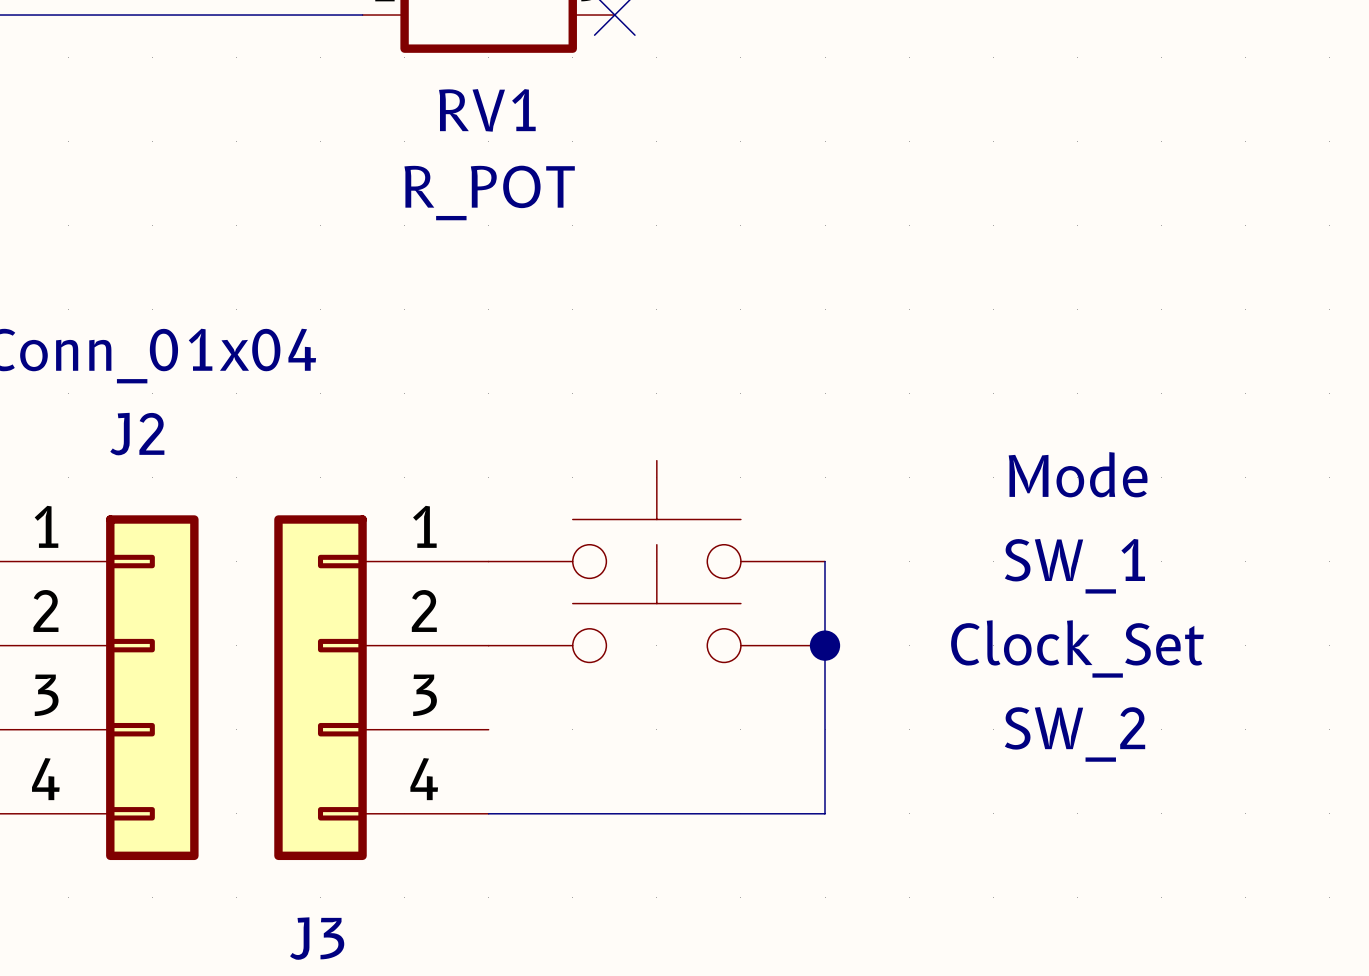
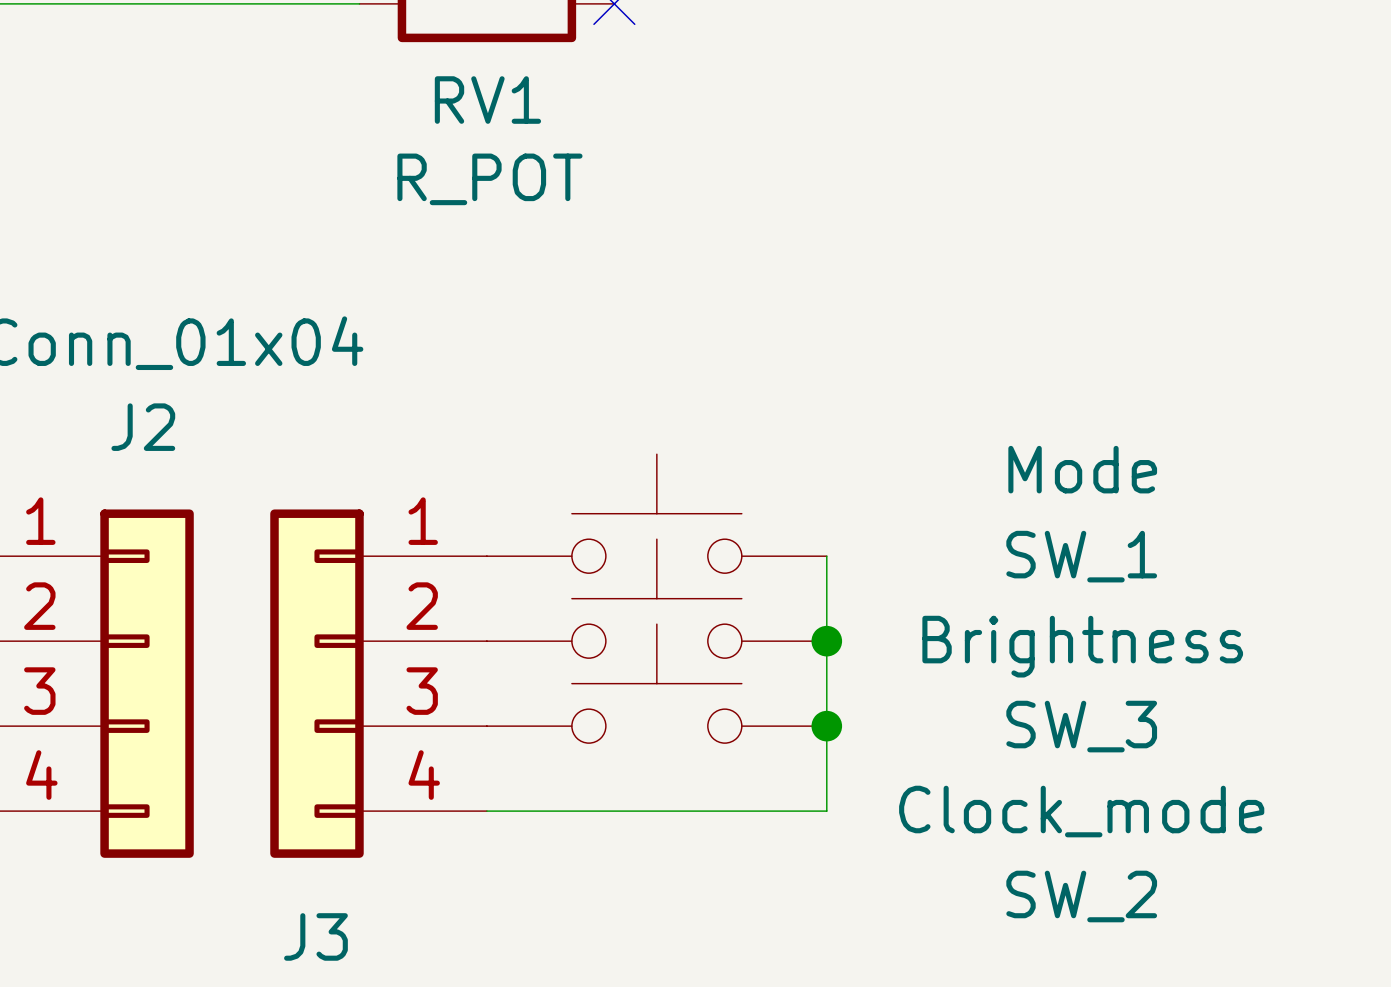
SW_2 value: Clock_Set (1077, 648) -> Brightness (1082, 646)
SW_2: none -> Clock_mode (656, 683)
junction: none -> (826, 726)
SW_2 name: SW_2 (1075, 734) -> SW_3 (1081, 726)

